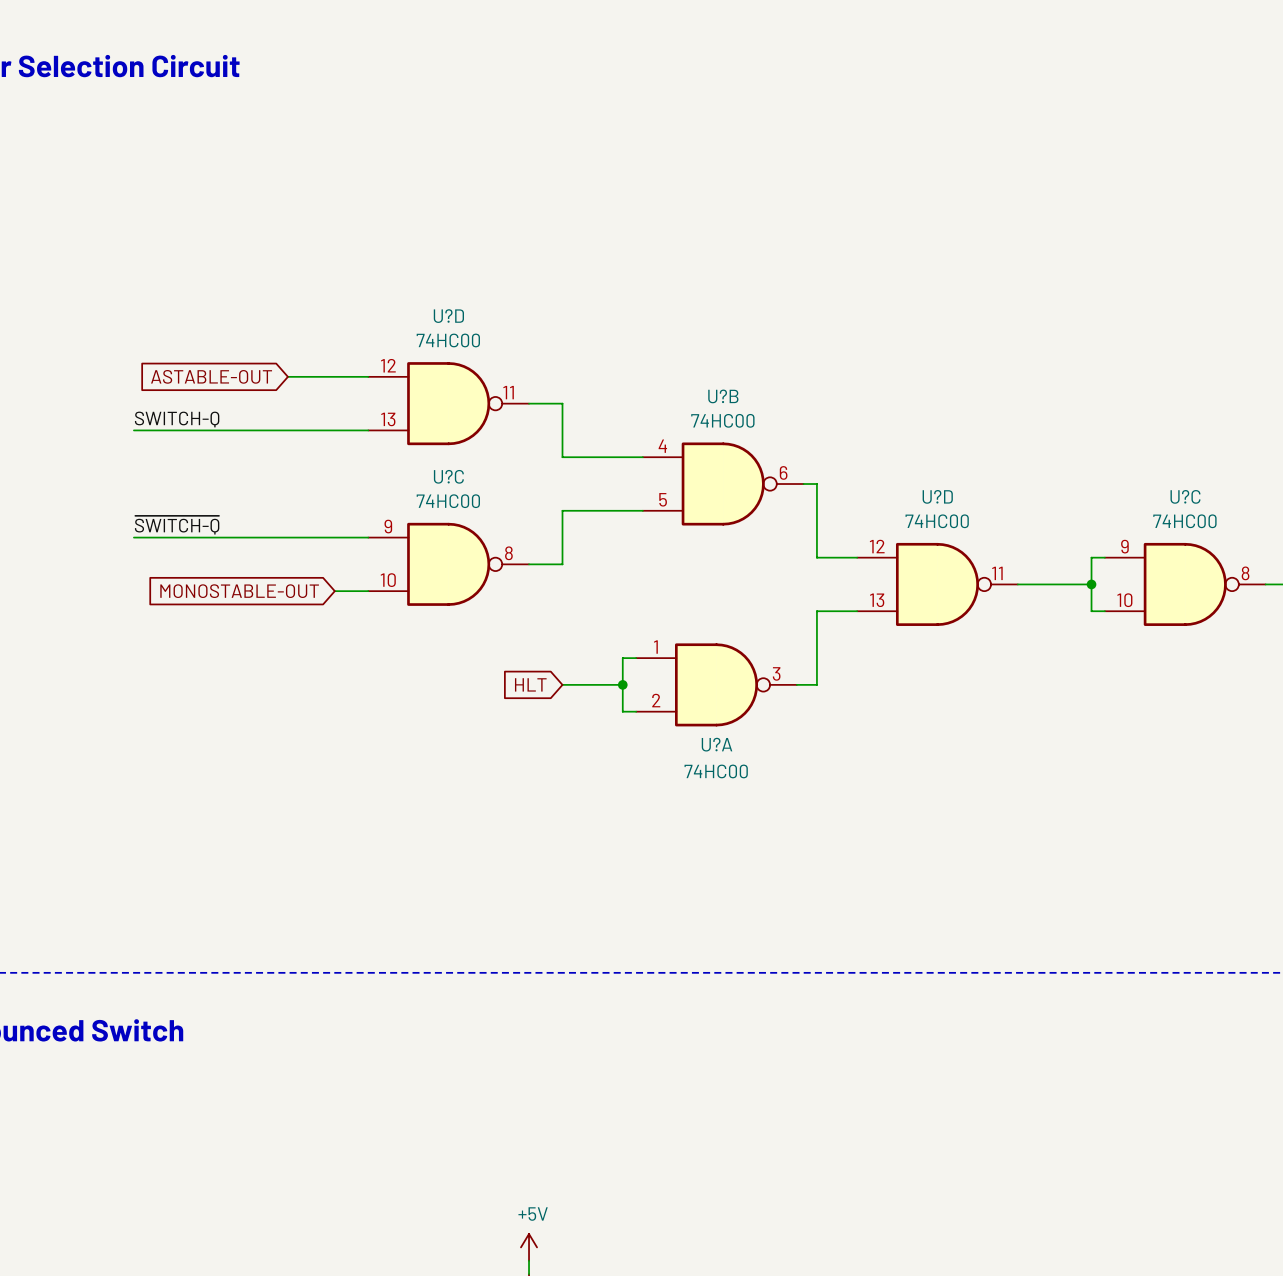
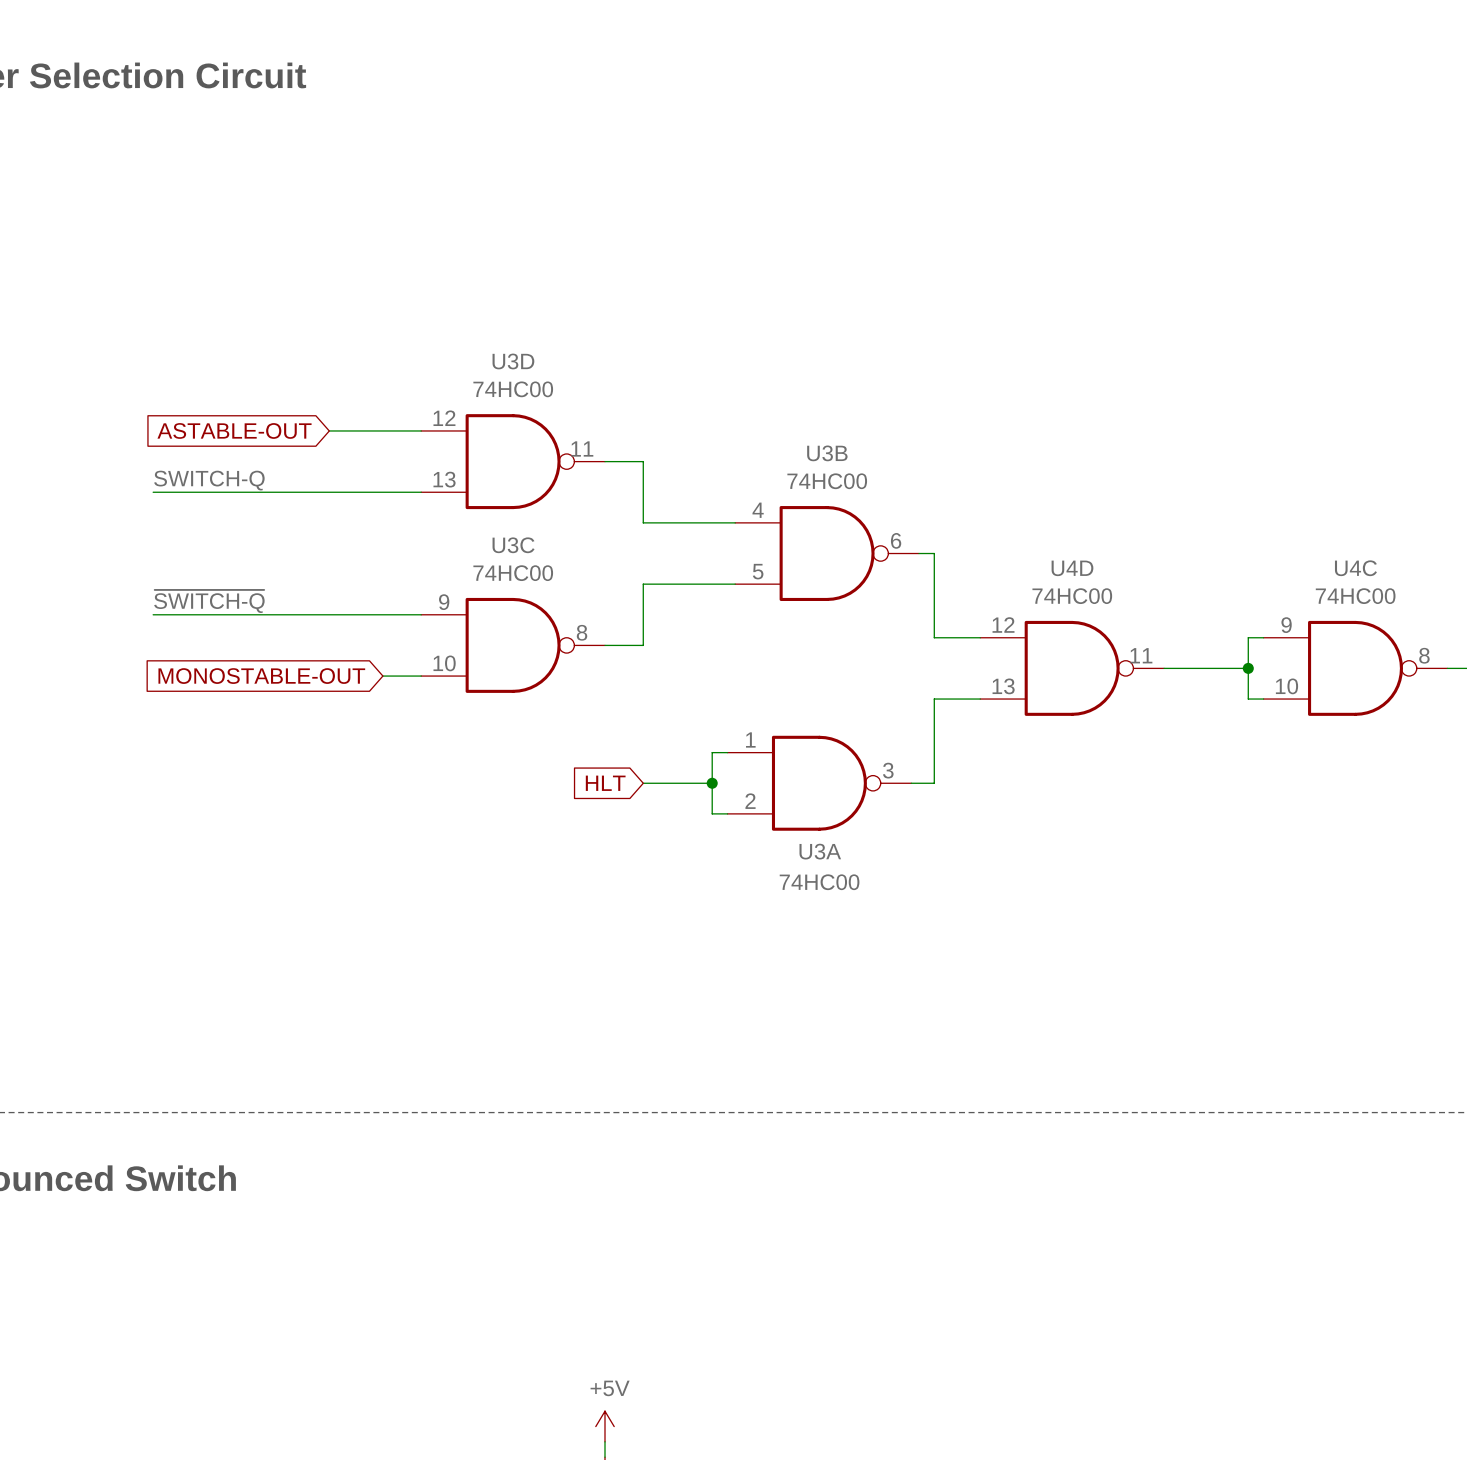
U?D name: U?D (448, 316) -> U3D (513, 361)
U?B name: U?B (723, 396) -> U3B (827, 453)
U?C name: U?C (448, 476) -> U3C (513, 545)
U?D name: U?D (937, 496) -> U4D (1072, 568)
U?C name: U?C (1185, 496) -> U4C (1355, 568)
U?A name: U?A (717, 744) -> U3A (820, 851)

